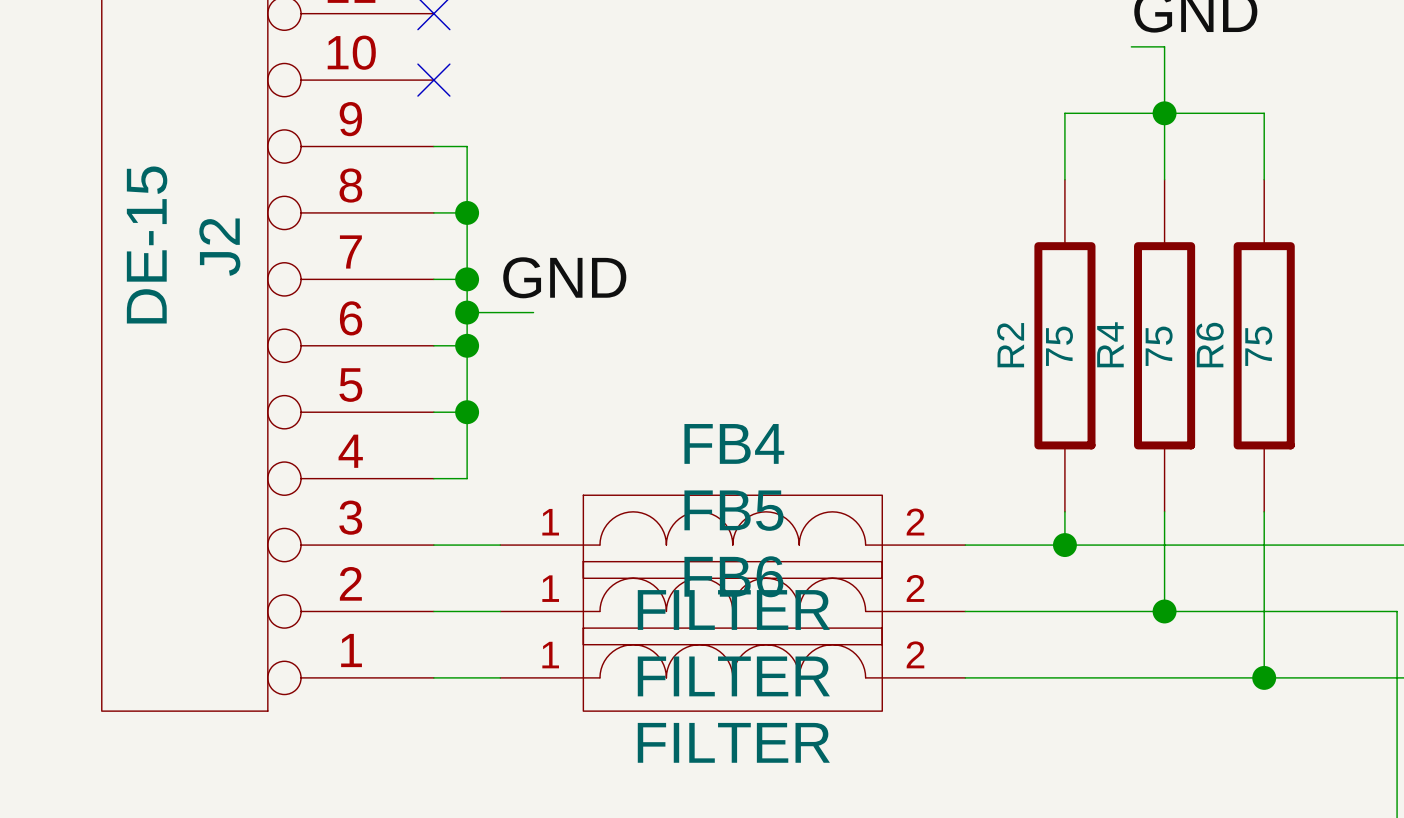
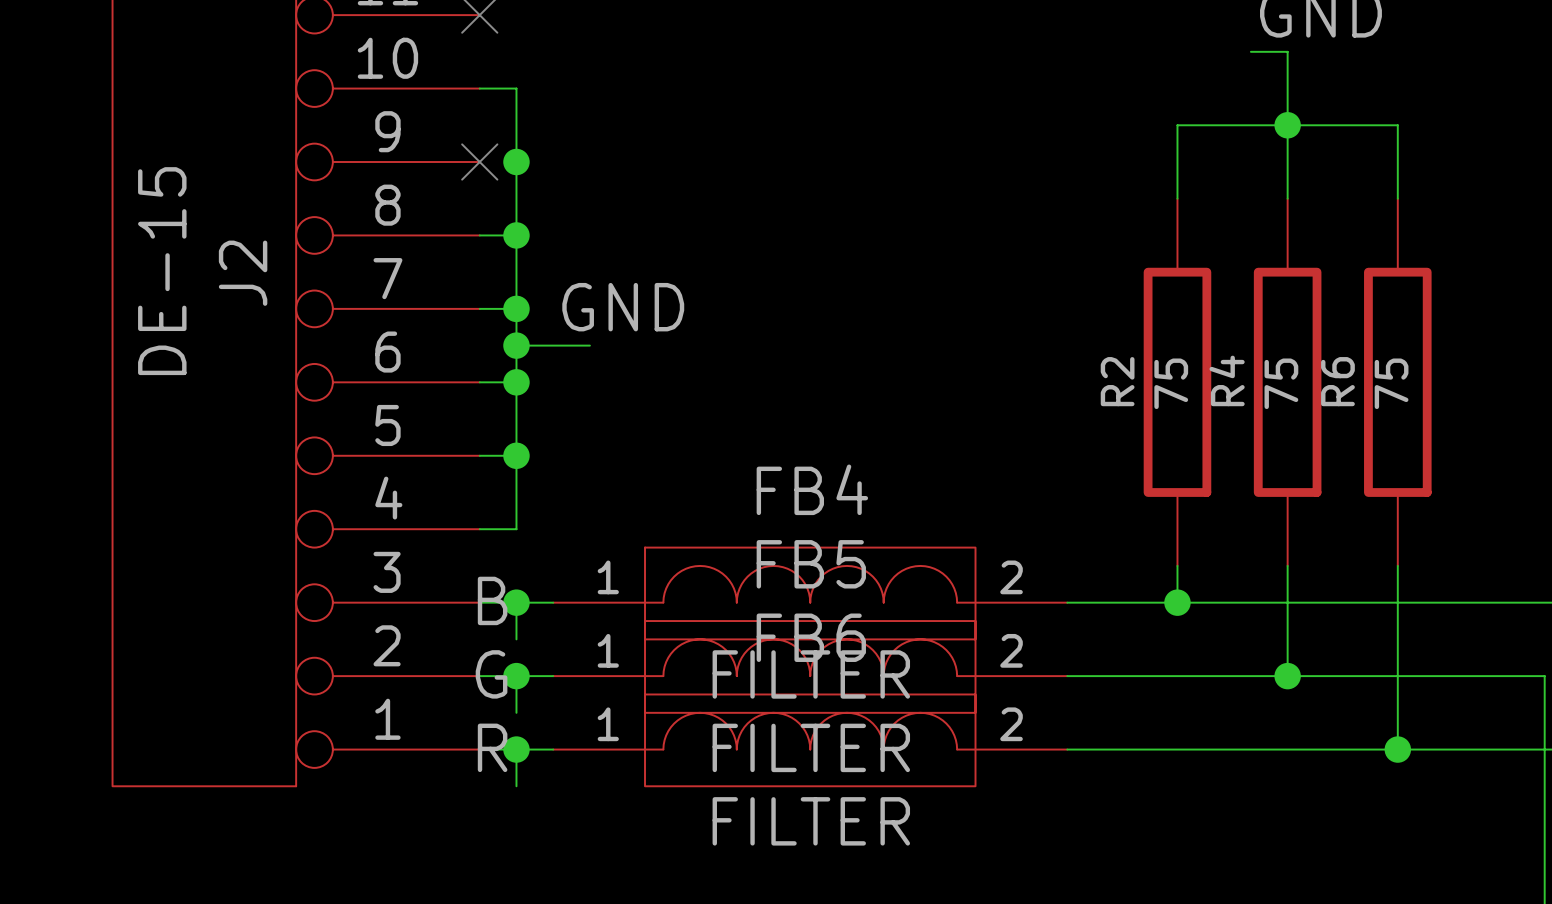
no-connect mark position: (433, 80) -> (479, 162)
wire: (433, 146) (467, 146) -> (479, 88) (516, 88) (516, 162)
junction: none -> (516, 162)
label: none -> B (492, 600)
wire: none -> (516, 602) (516, 639)
junction: none -> (516, 602)
label: none -> G (491, 674)
wire: none -> (516, 676) (516, 712)
junction: none -> (516, 676)
label: none -> R (492, 747)
wire: none -> (516, 749) (516, 786)
junction: none -> (516, 749)

